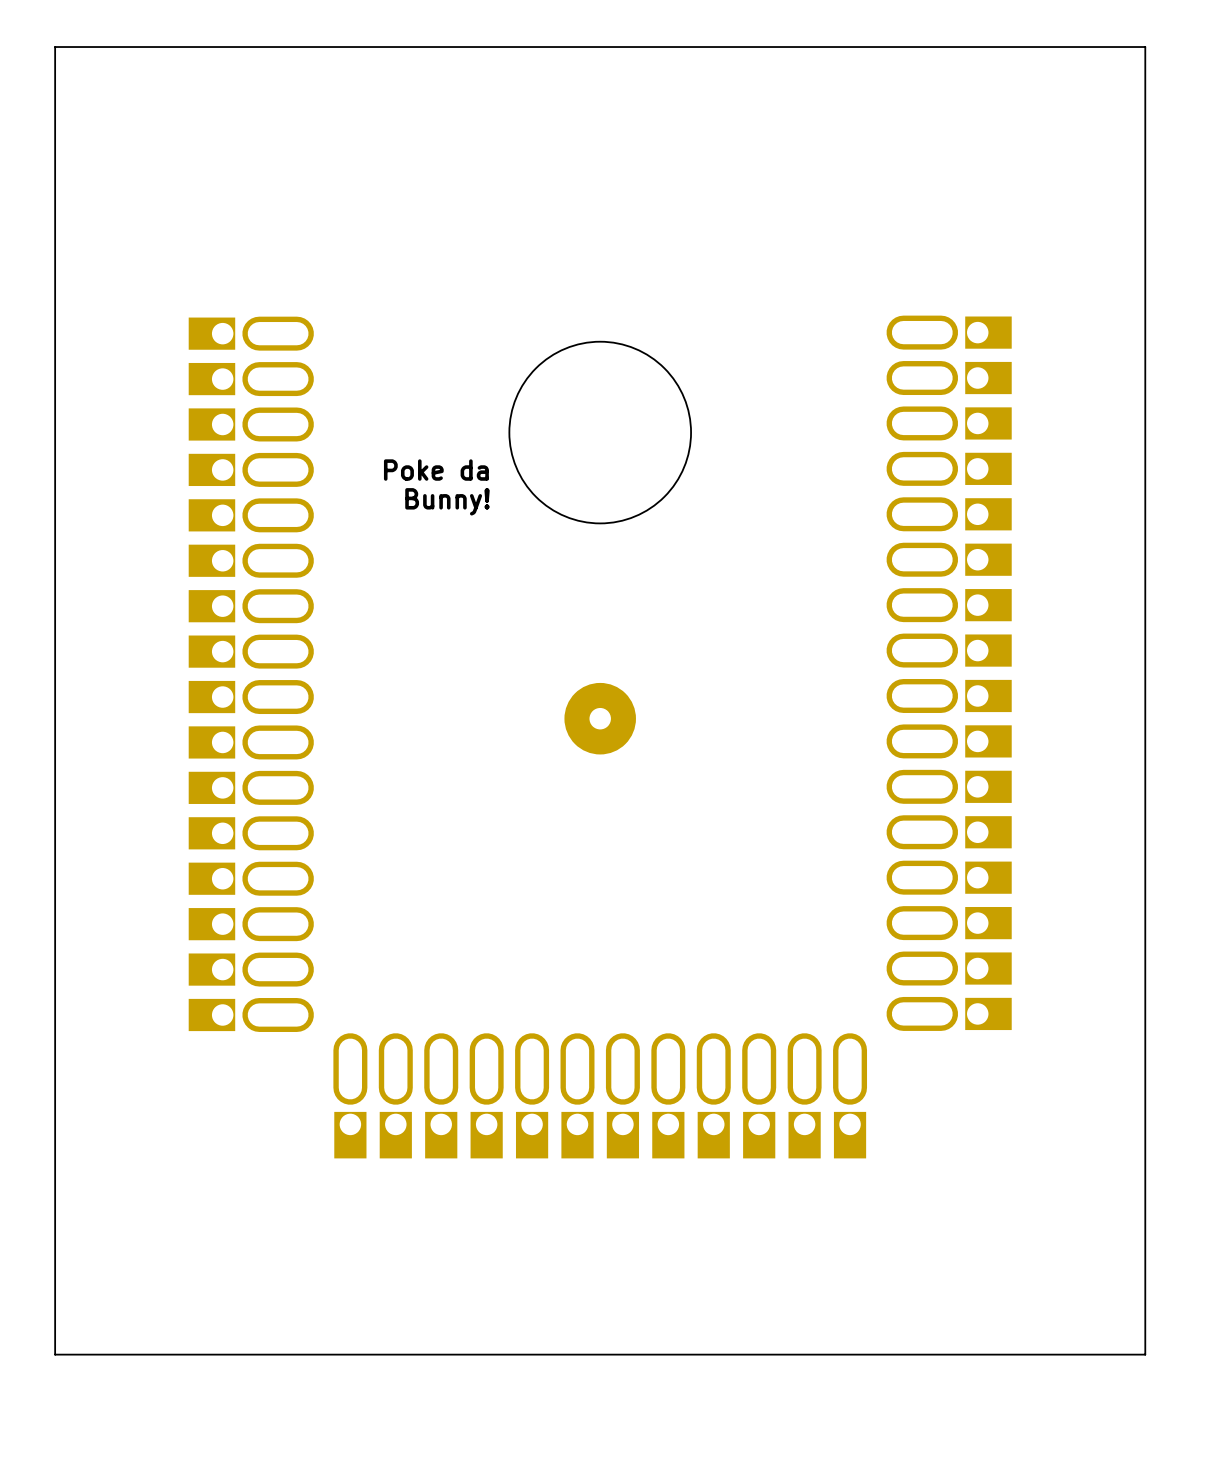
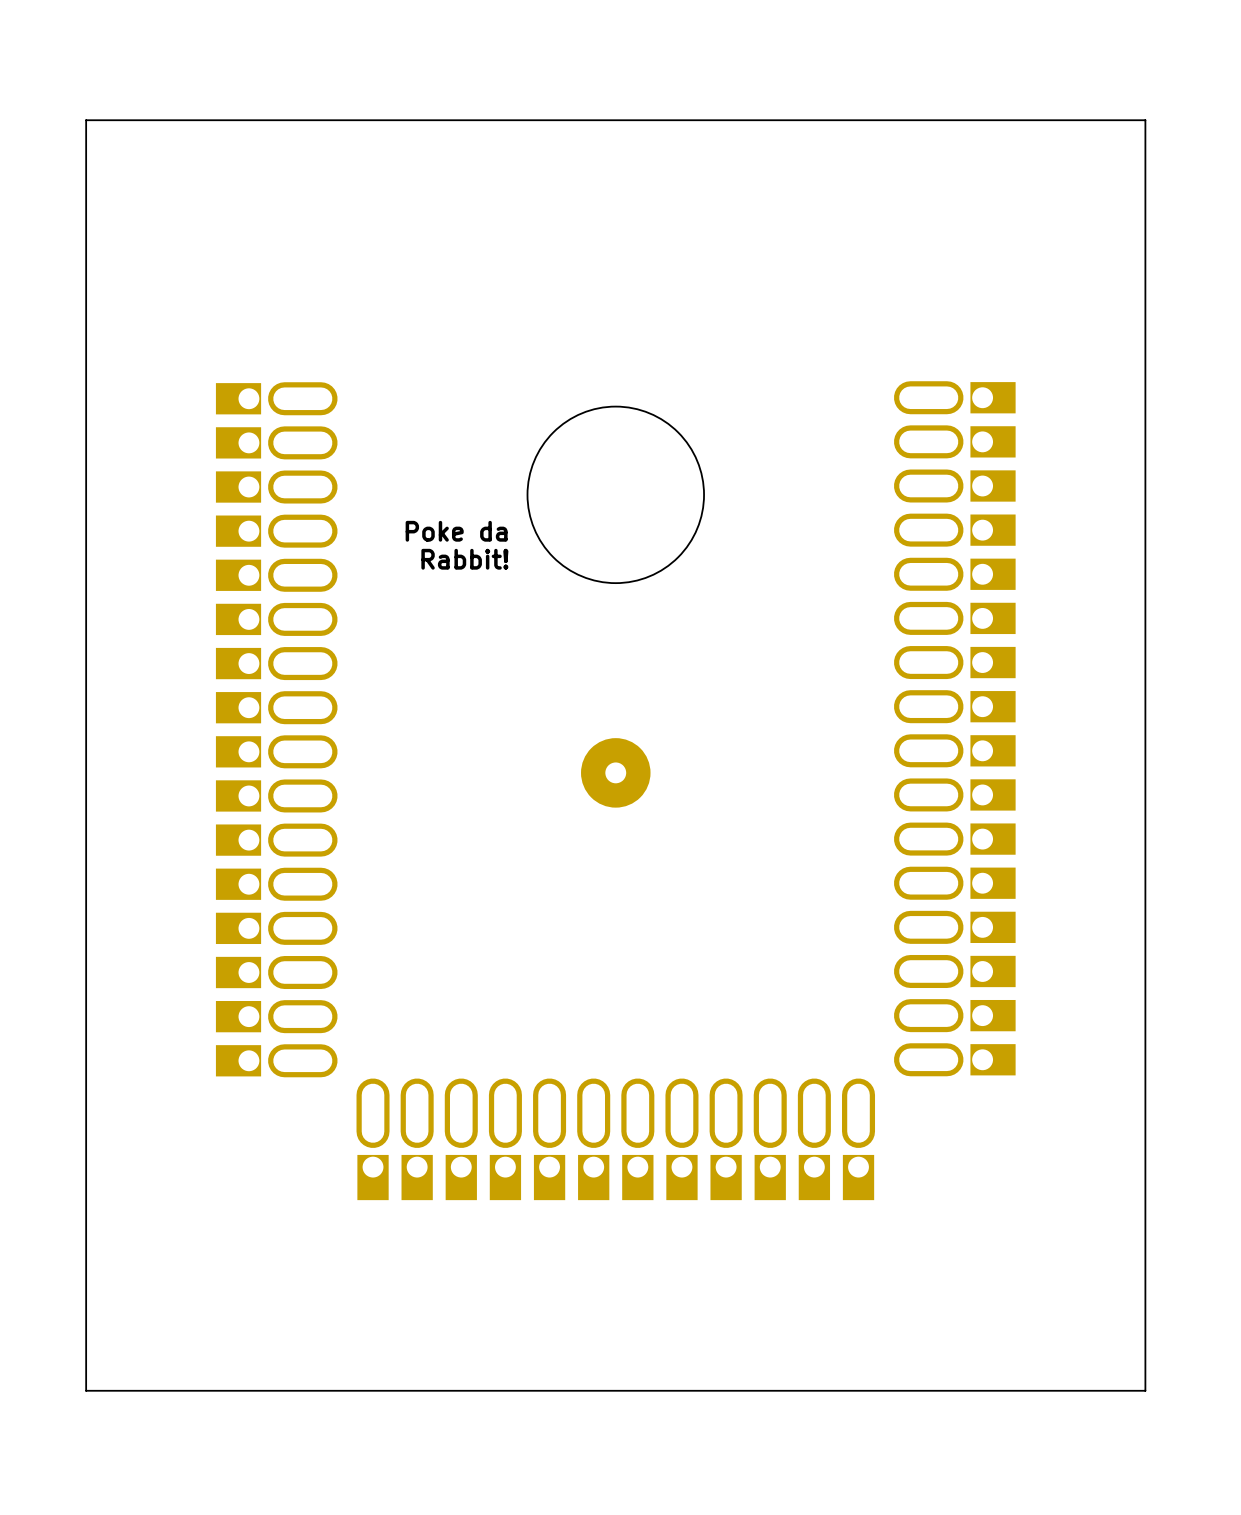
text: Bunny! (447, 501) -> Rabbit! (464, 559)

